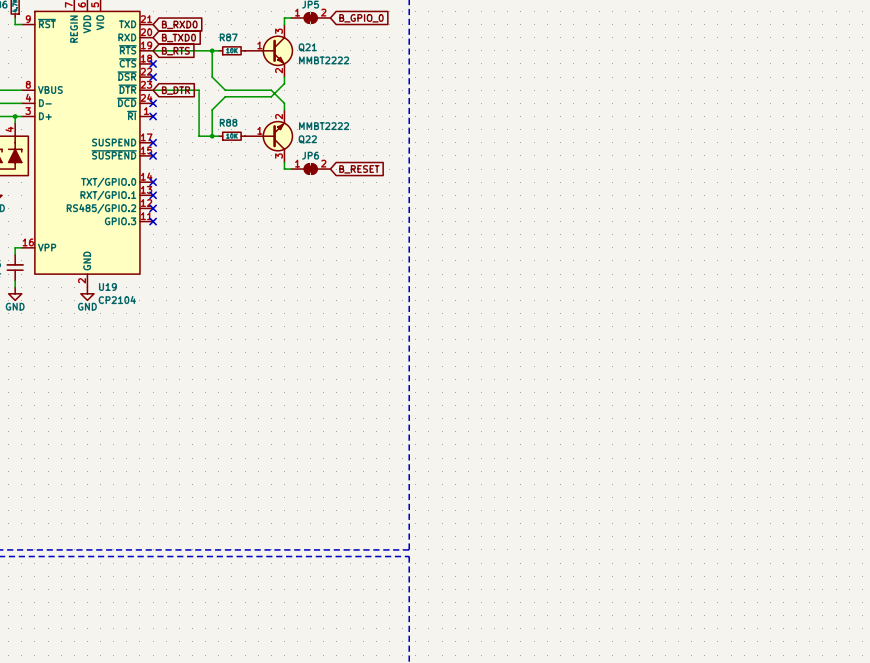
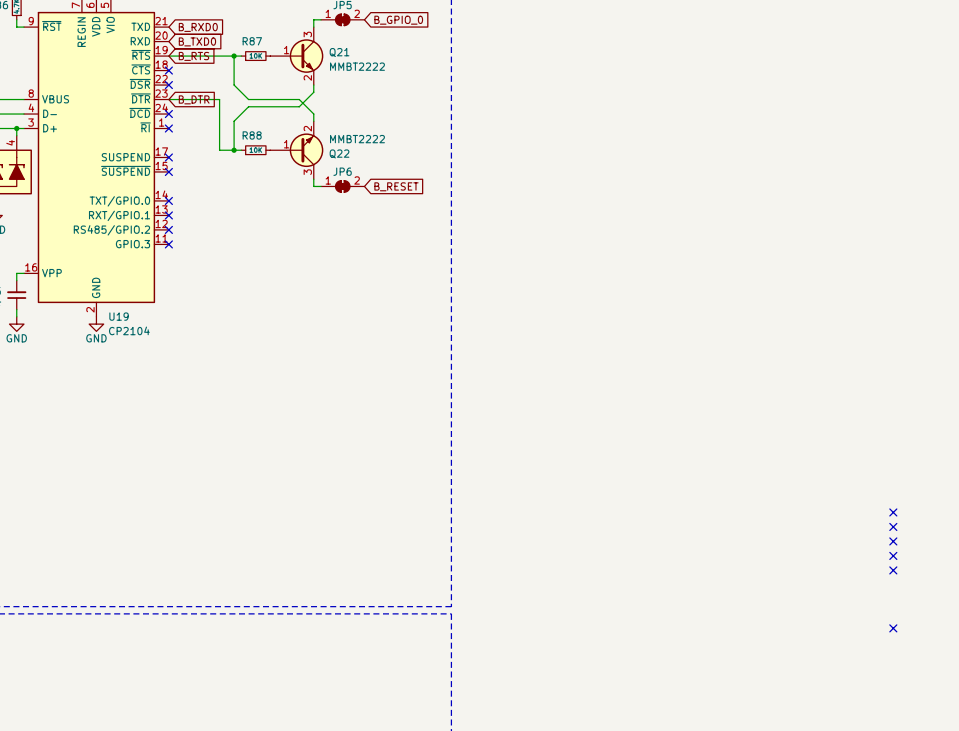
no-connect mark: none -> (893, 512)
no-connect mark: none -> (893, 526)
no-connect mark: none -> (893, 541)
no-connect mark: none -> (893, 555)
no-connect mark: none -> (893, 570)
no-connect mark: none -> (893, 628)

